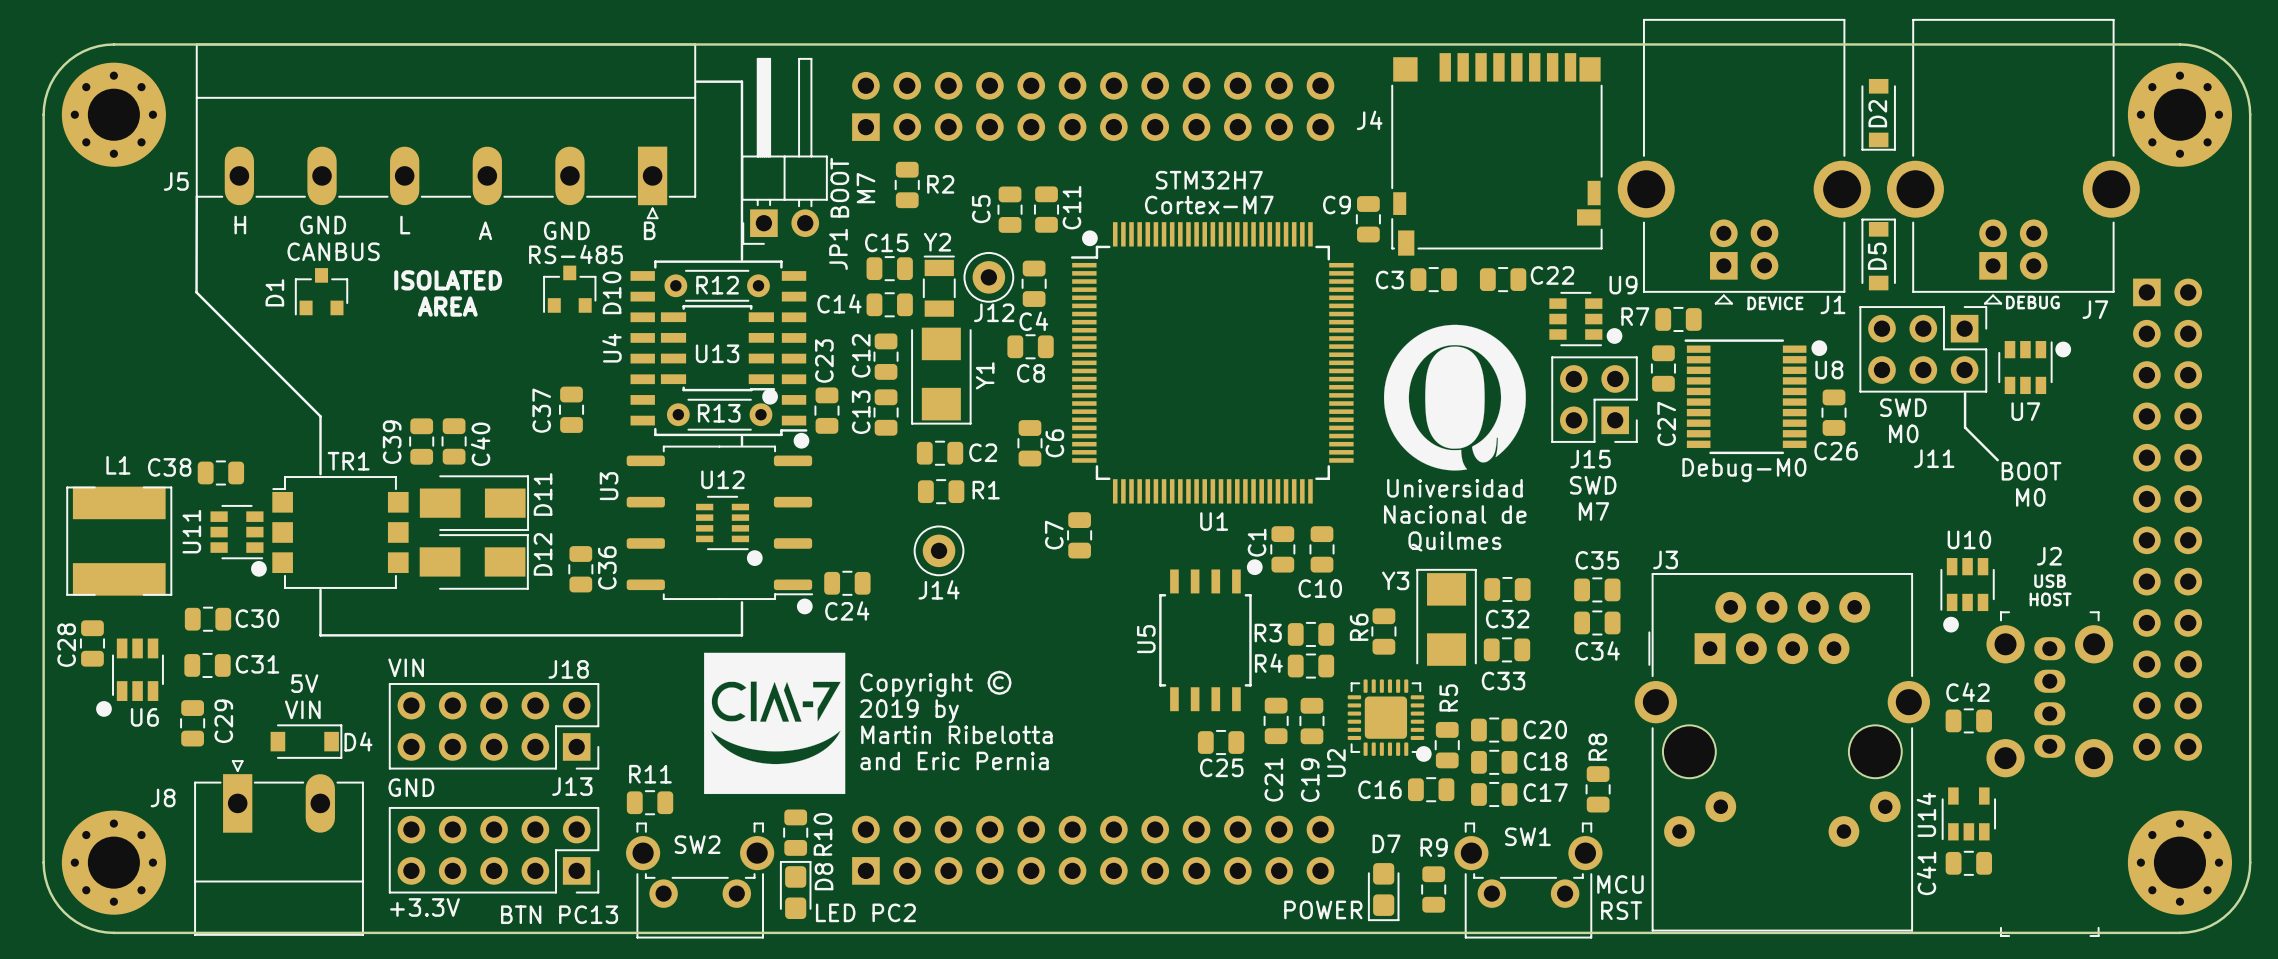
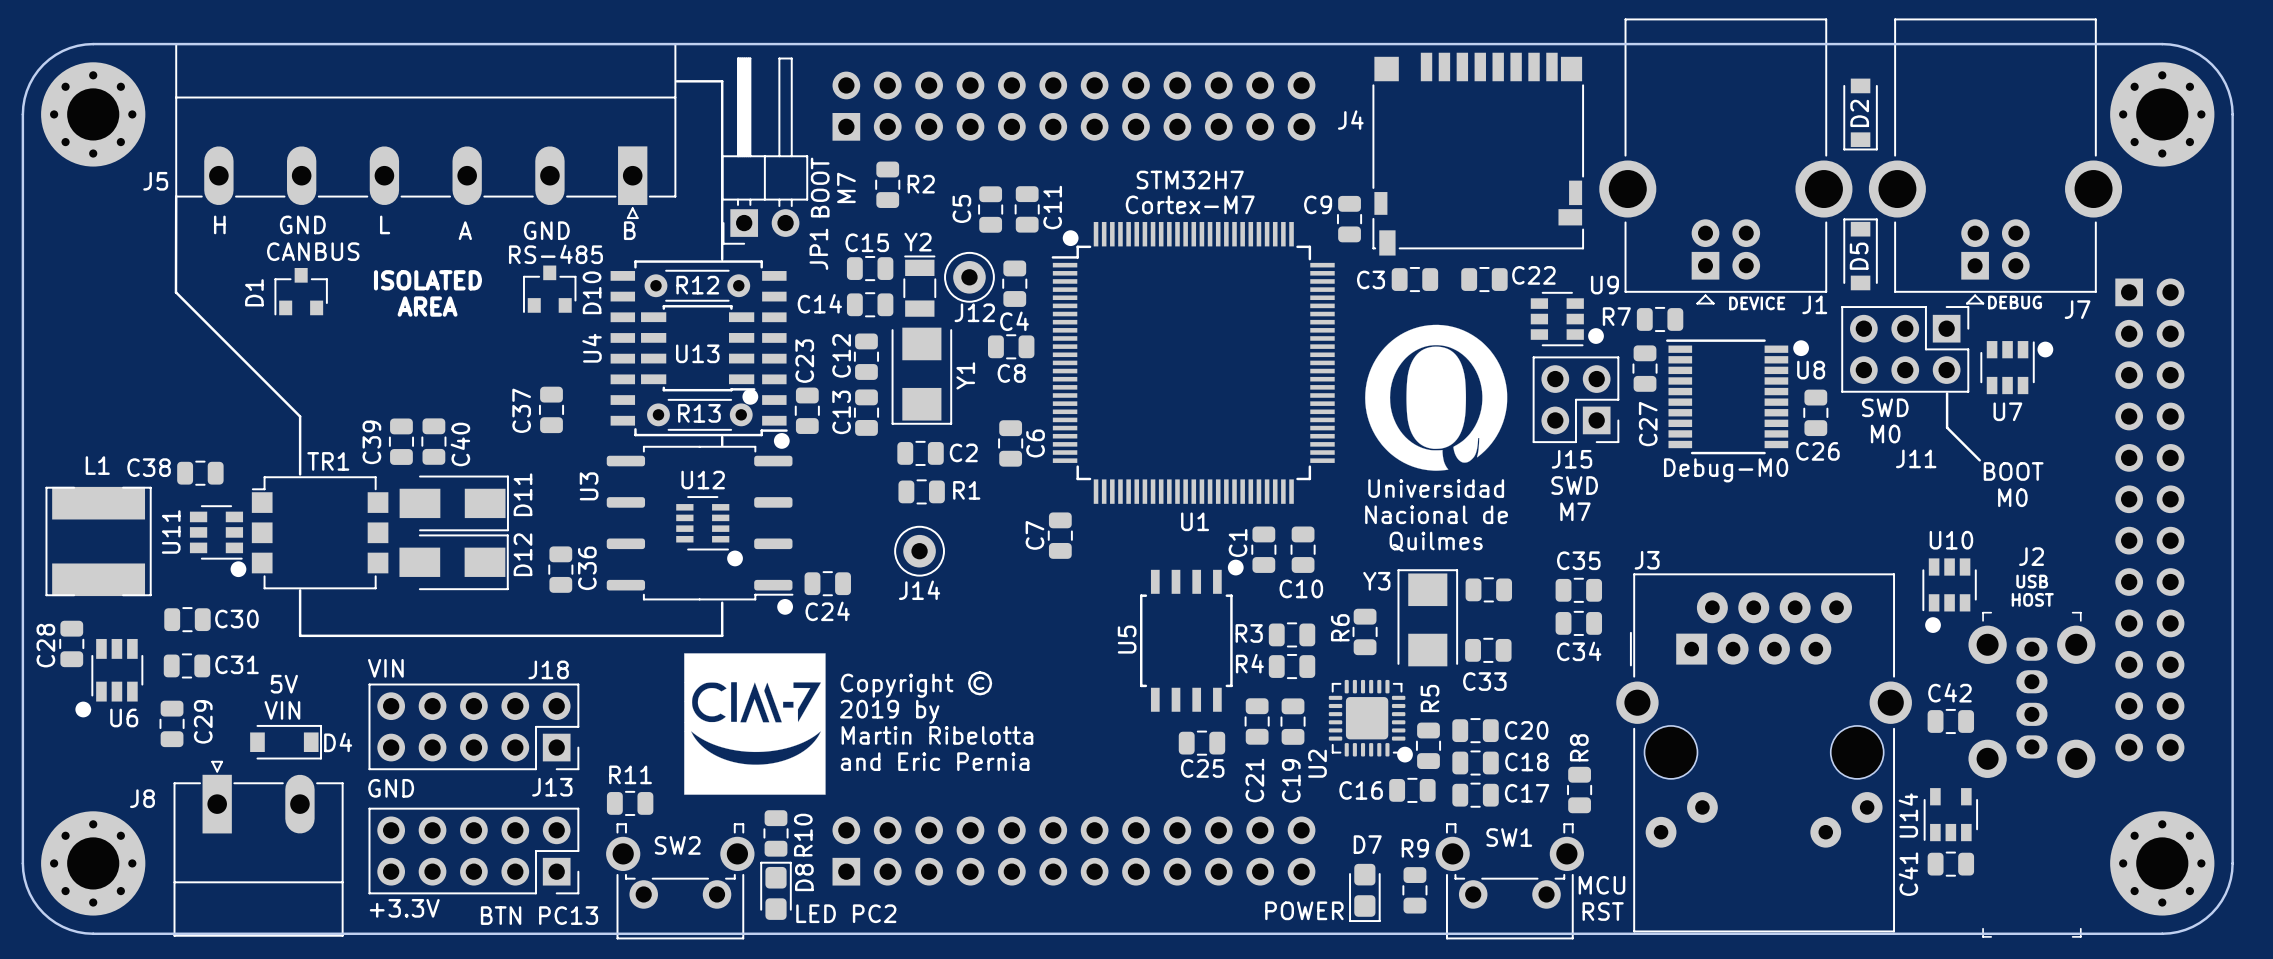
C32 name: C32 (1507, 619) -> none

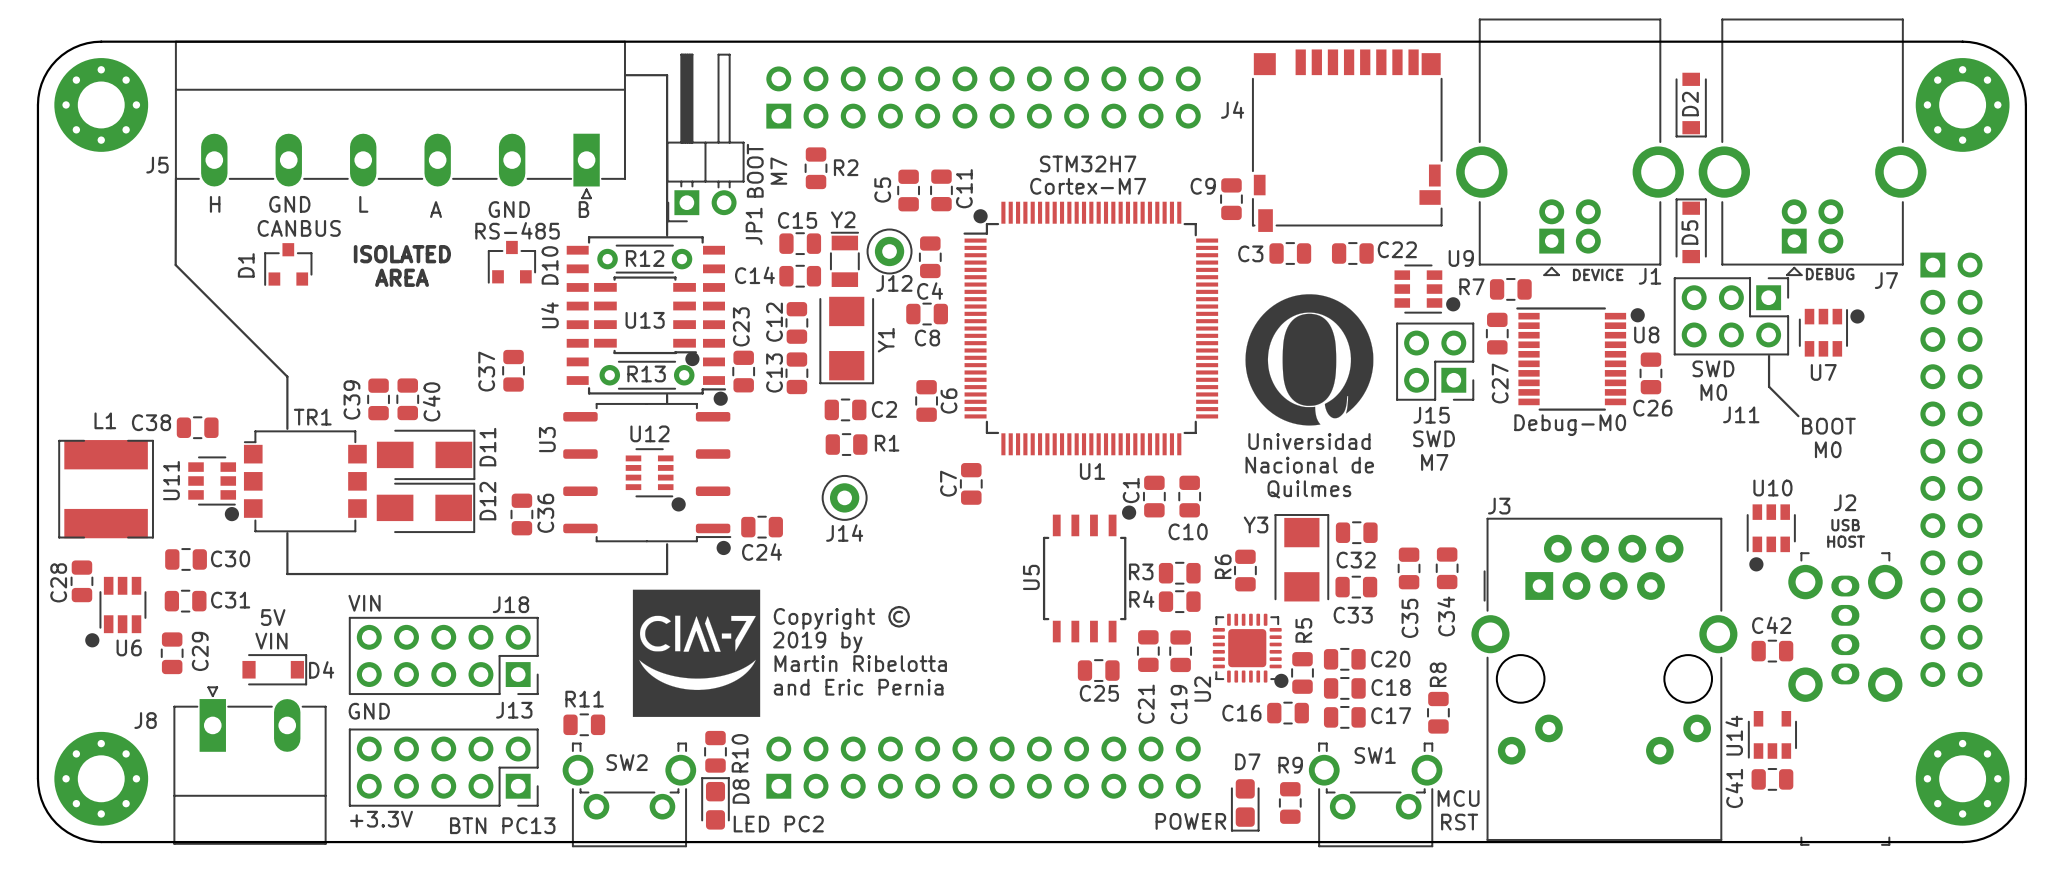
C35 name position: C35 (1578, 560) -> C35 (1409, 618)
C35 rotation: 0° (1578, 590) -> 90° clockwise (1409, 568)
C35 position: (1578, 590) -> (1409, 568)
C32 name: none -> C32 (1356, 560)
C34 rotation: 0° (1578, 623) -> 90° clockwise (1447, 568)

